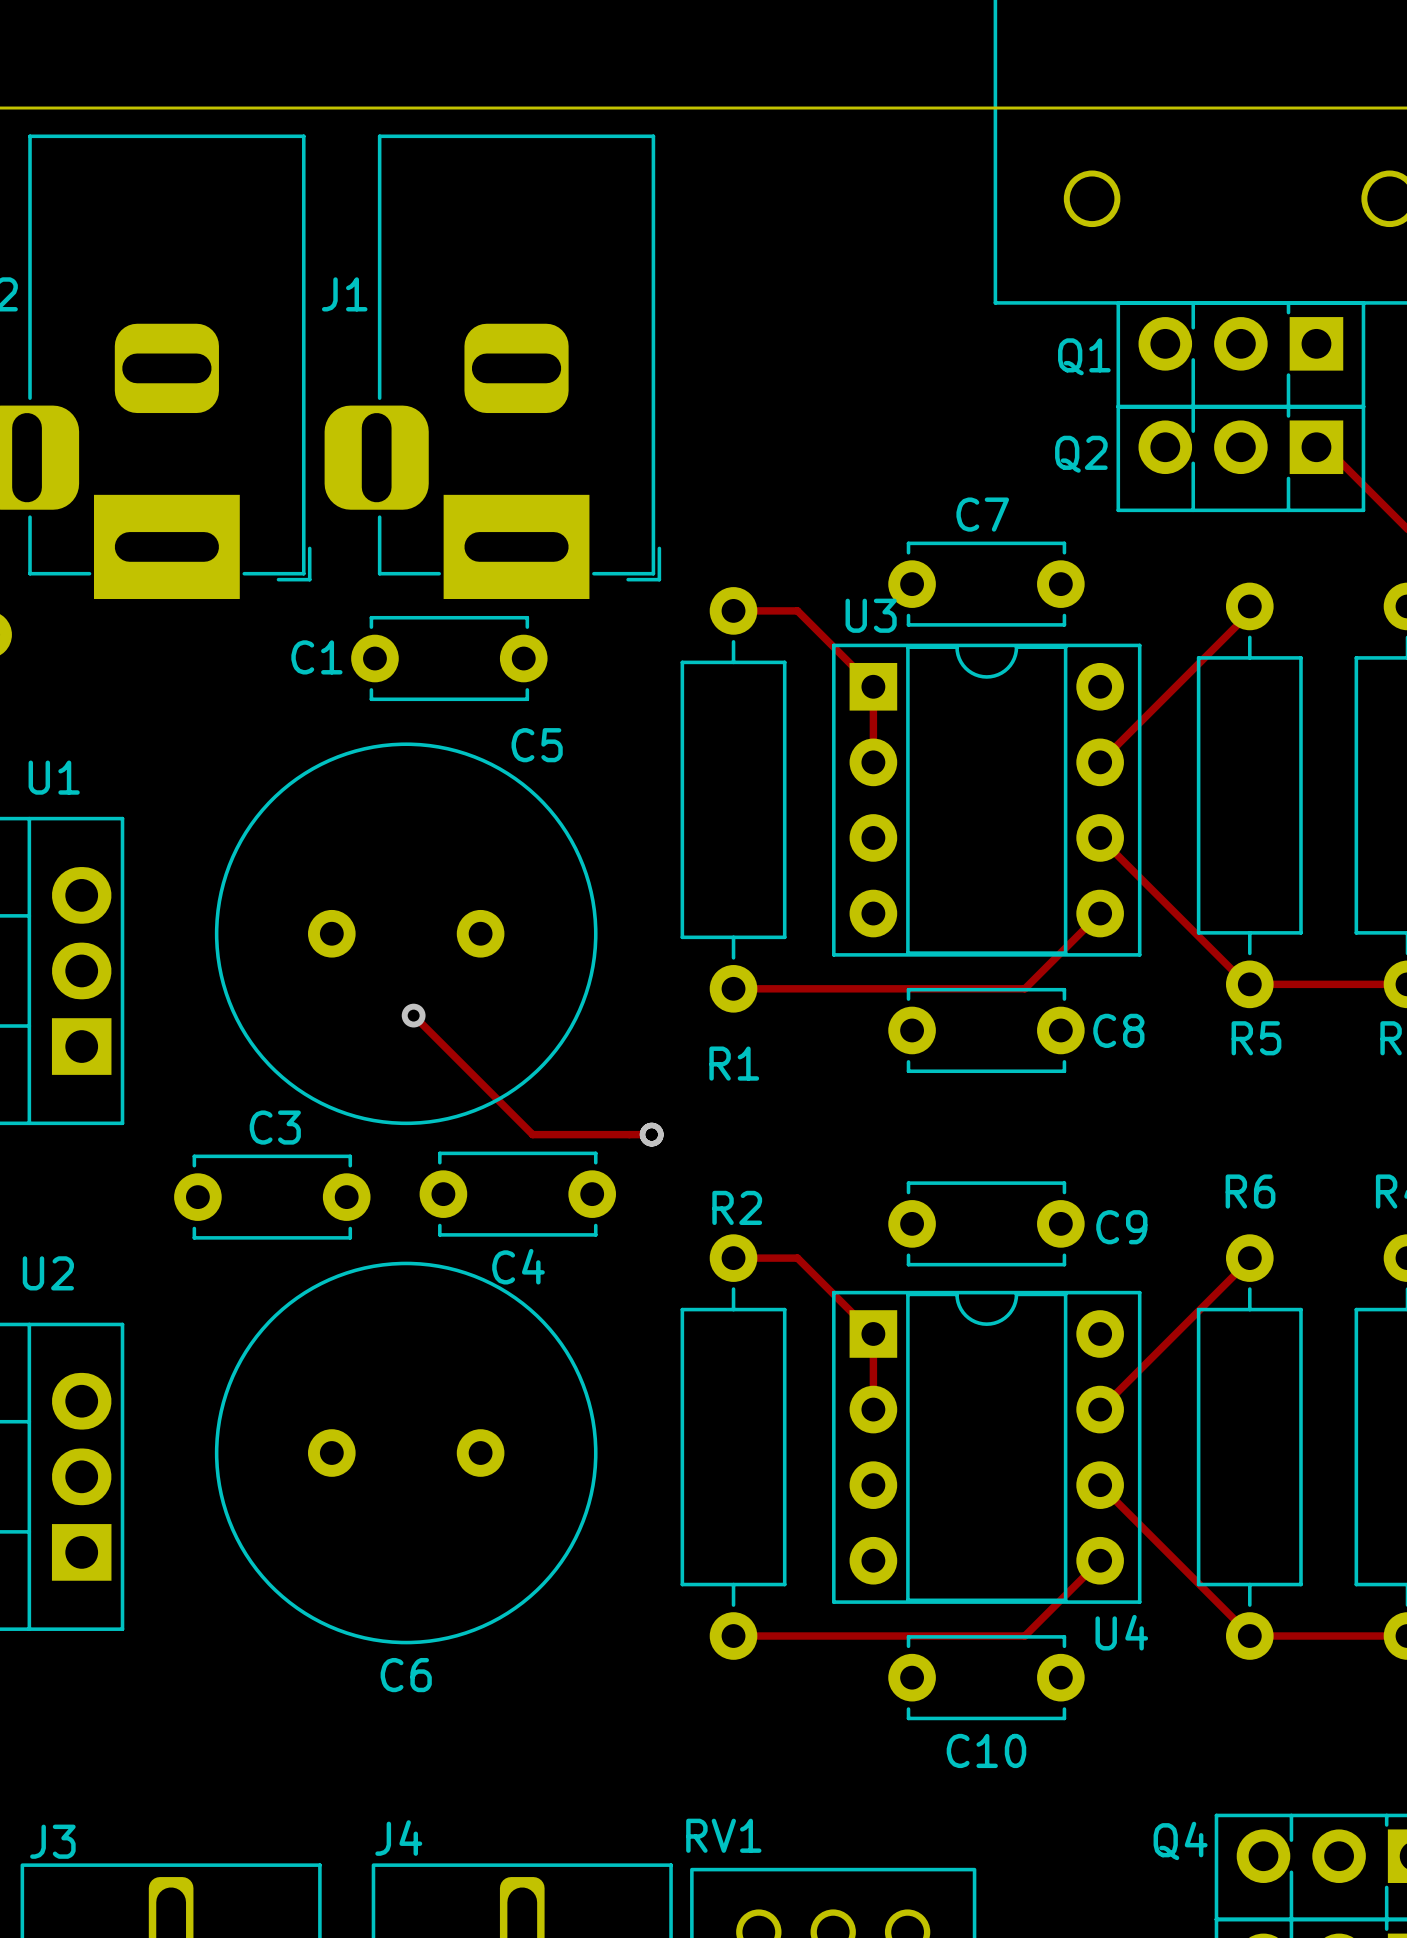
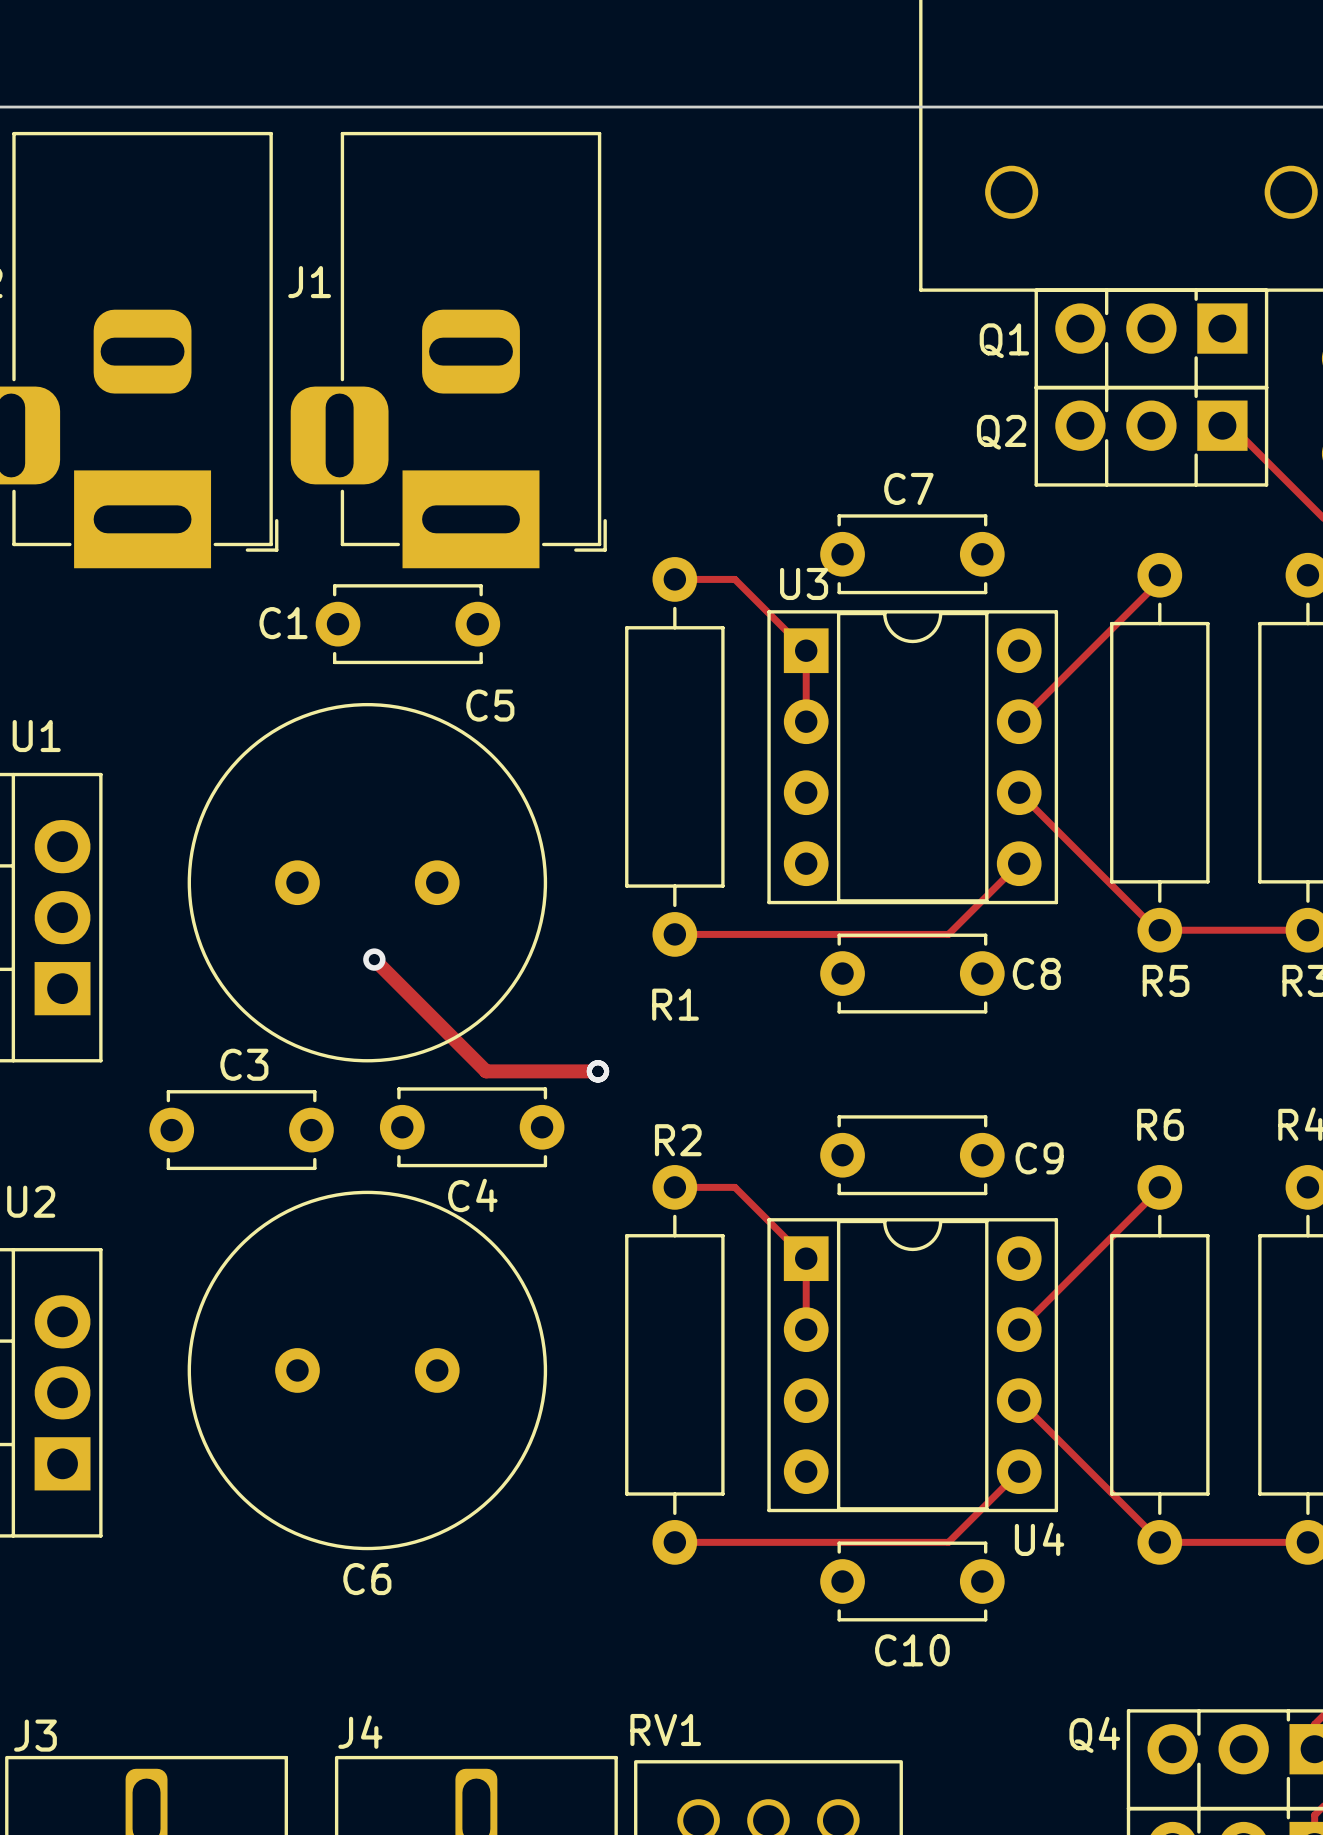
track width: thin (413, 1015) (532, 1134) (651, 1134) -> thick (374, 959) (486, 1071) (597, 1071)

